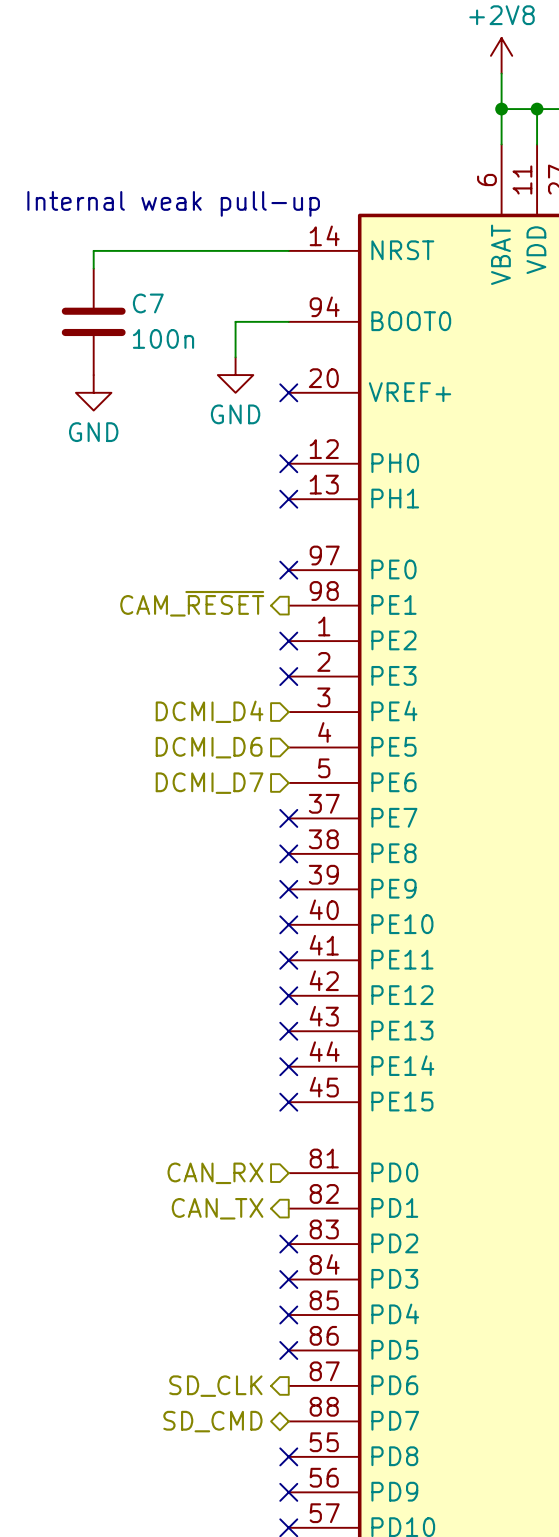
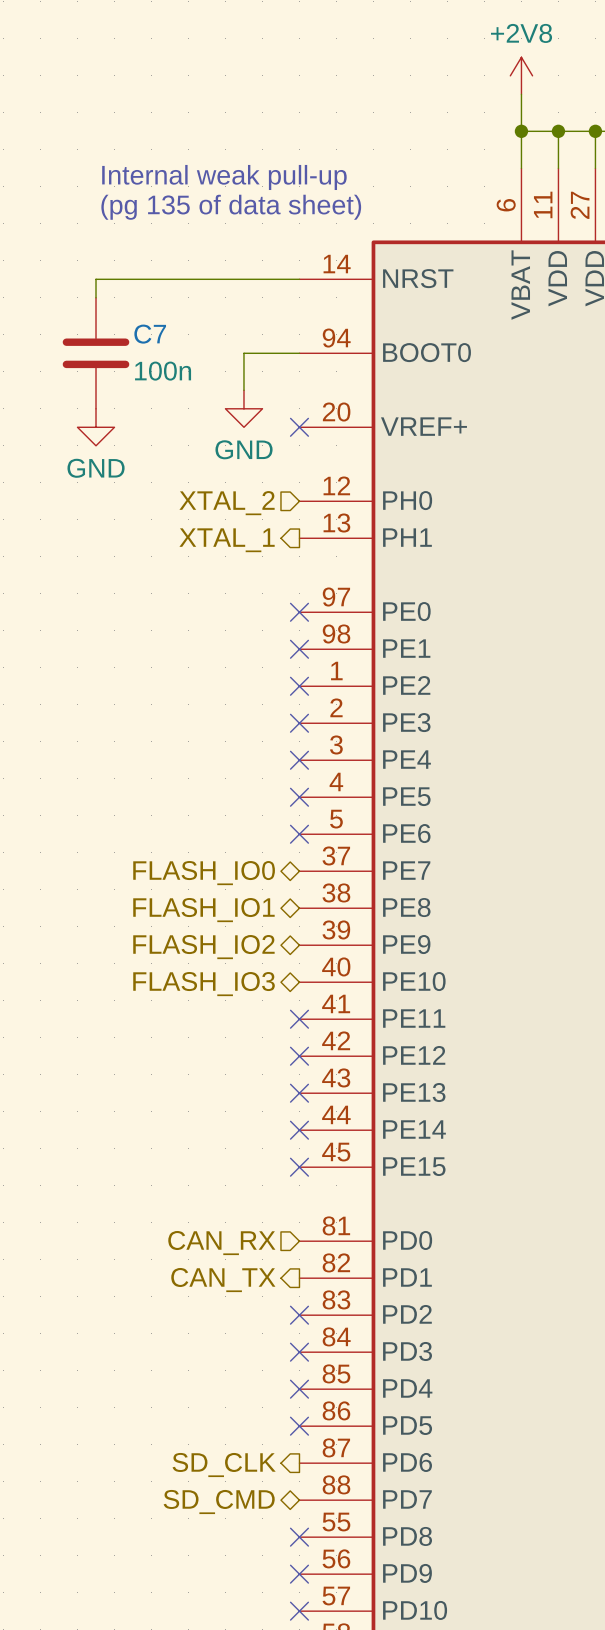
text: none -> (pg 135 of data sheet) (231, 207)
text position: Internal weak pull-up (173, 203) -> Internal weak pull-up (224, 177)
hierarchical label: none -> XTAL_2 (227, 503)
no-connect mark: (288, 463) -> none
hierarchical label: none -> XTAL_1 (227, 540)
no-connect mark: (288, 499) -> none
hierarchical label: CAM_~{RESET} (192, 603) -> none
no-connect mark: none -> (299, 649)
hierarchical label: DCMI_D4 (209, 711) -> none
no-connect mark: none -> (299, 760)
hierarchical label: DCMI_D6 (209, 747) -> none
no-connect mark: none -> (299, 797)
no-connect mark: none -> (299, 834)
hierarchical label: DCMI_D7 (209, 783) -> none
hierarchical label: none -> FLASH_IO0 (204, 873)
no-connect mark: (288, 818) -> none
no-connect mark: (288, 853) -> none
hierarchical label: none -> FLASH_IO1 (203, 910)
hierarchical label: none -> FLASH_IO2 (203, 947)
no-connect mark: (288, 889) -> none
no-connect mark: (288, 924) -> none
hierarchical label: none -> FLASH_IO3 (204, 984)

